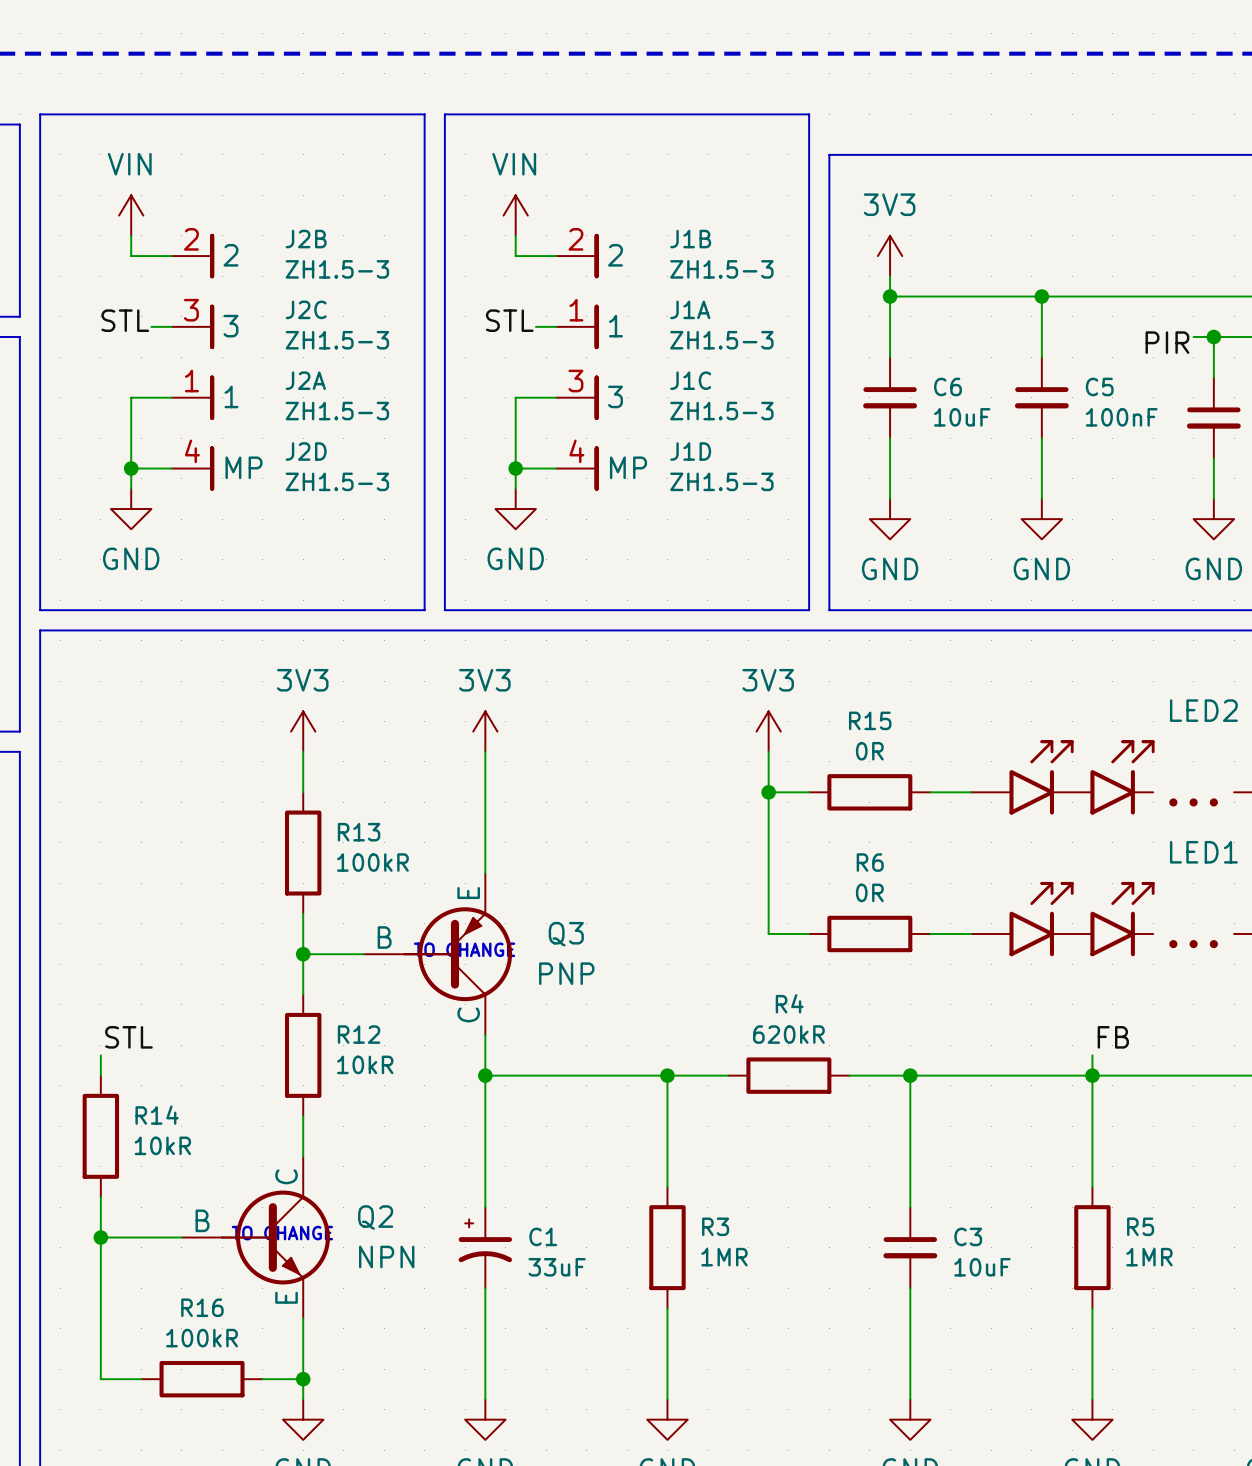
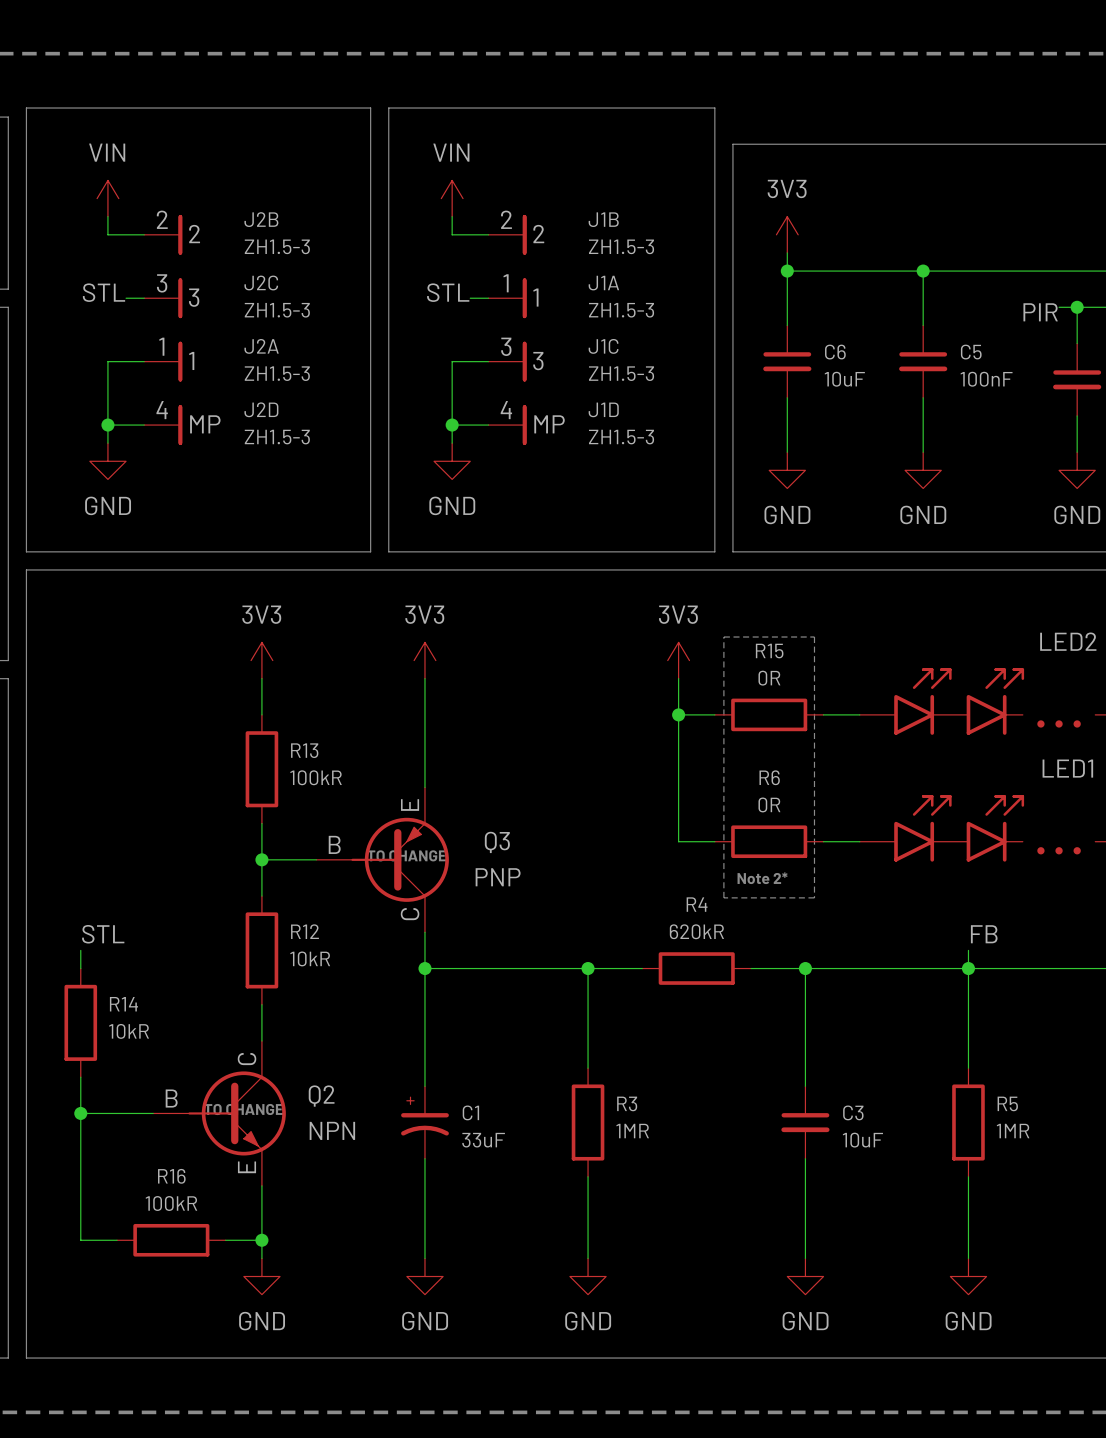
line: none -> (723, 637) (814, 637) (814, 897) (723, 897) (723, 637)
text: none -> Note 2* (762, 878)

